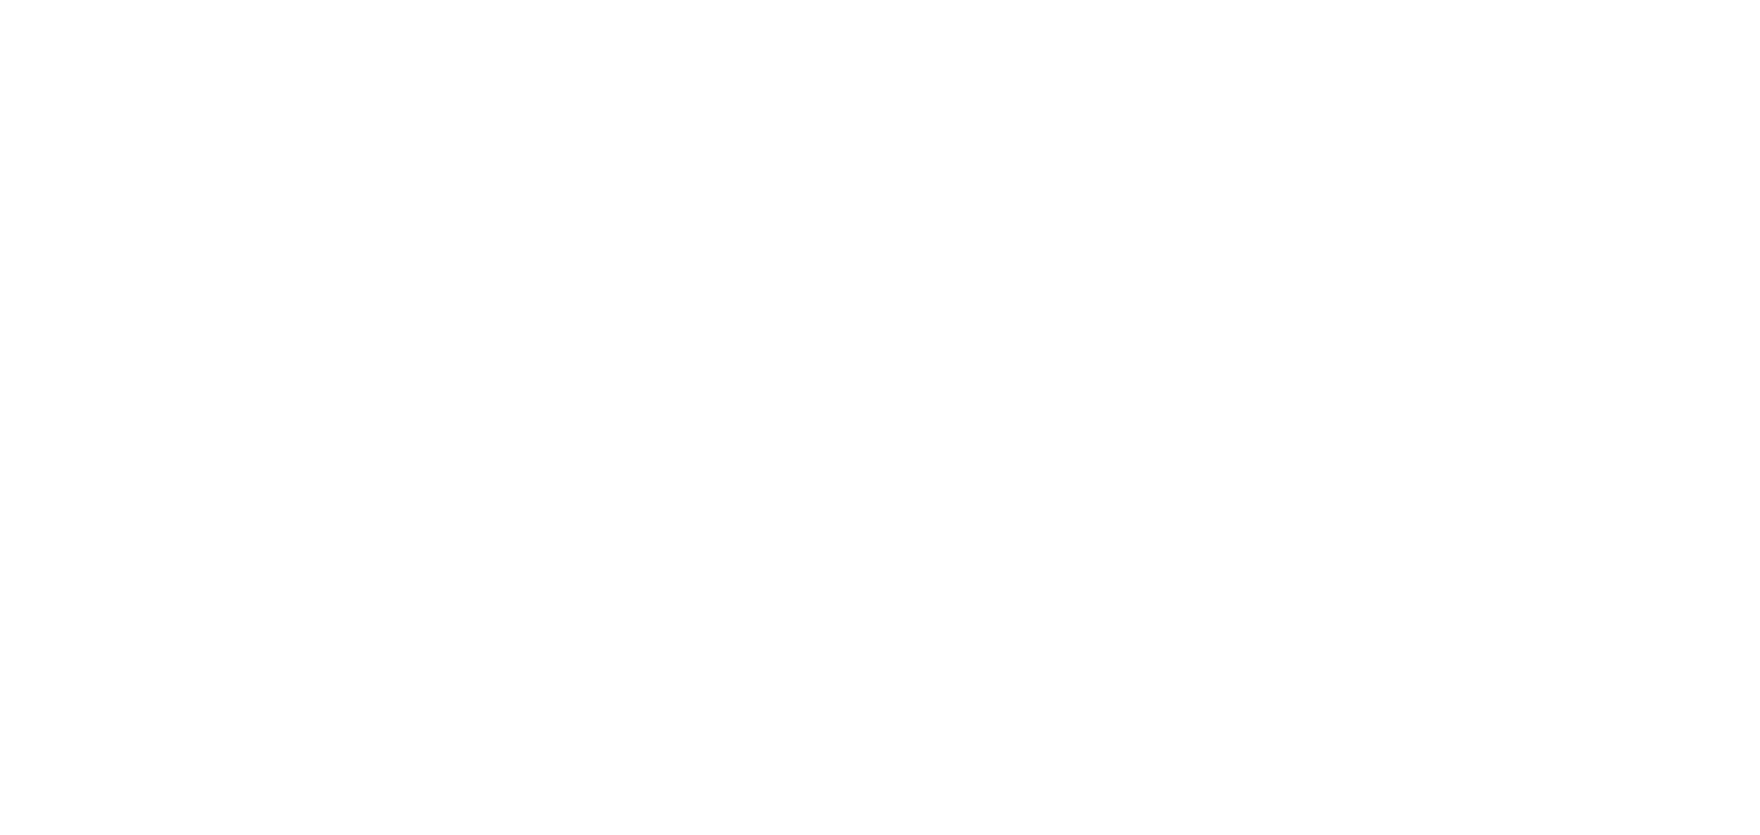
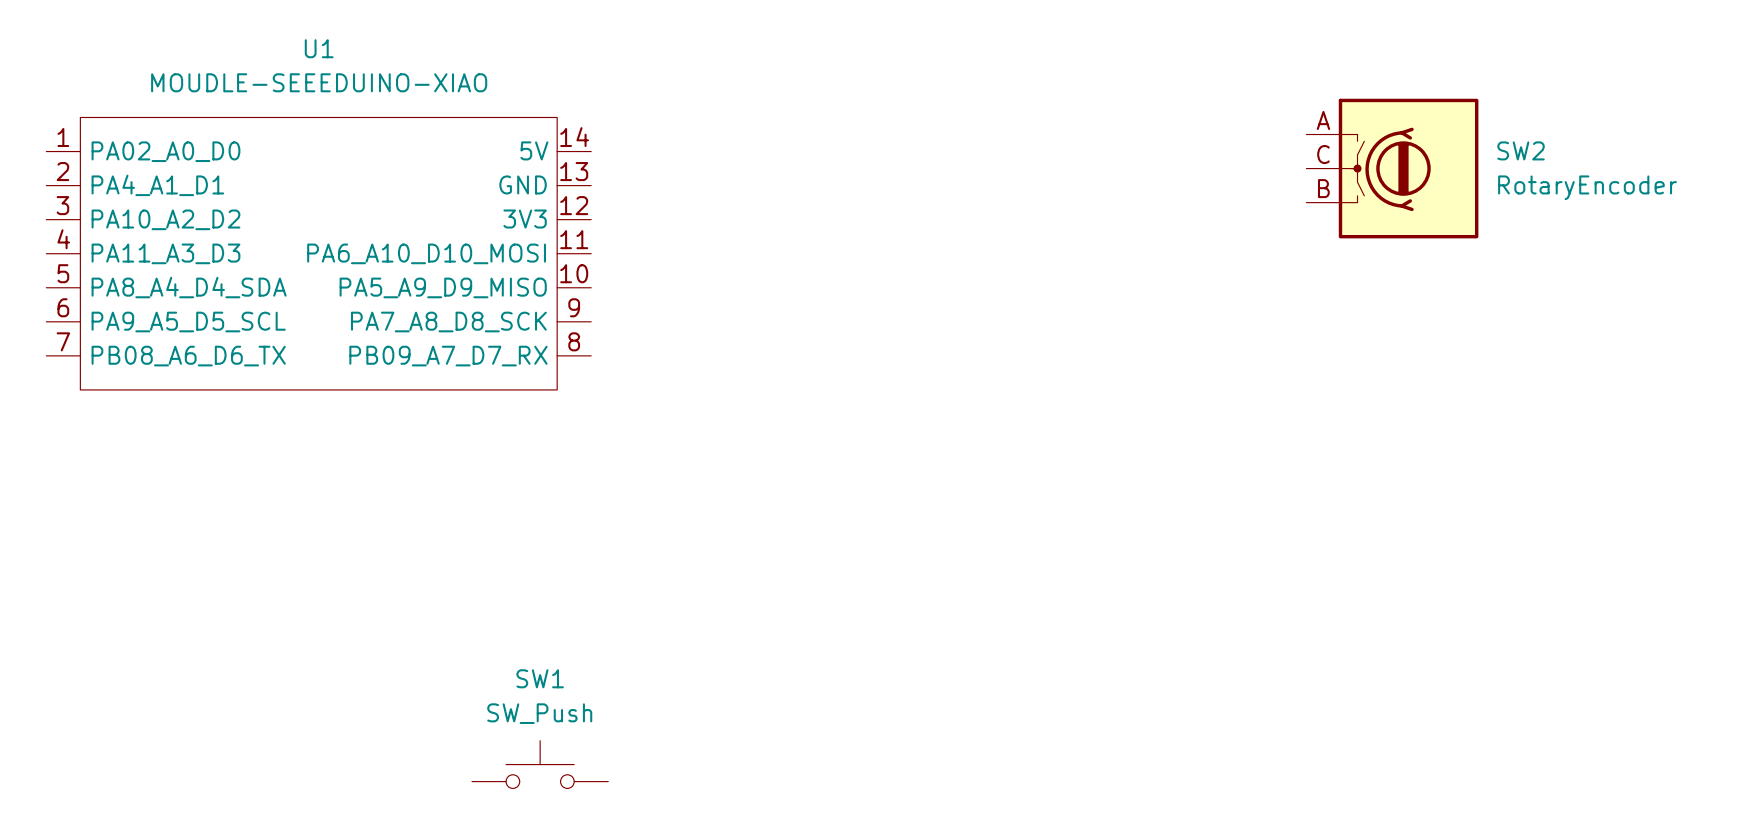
SW2: none -> RotaryEncoder (1392, 168)
U1: none -> MOUDLE-SEEEDUINO-XIAO (318, 253)
SW1: none -> SW_Push (540, 764)

